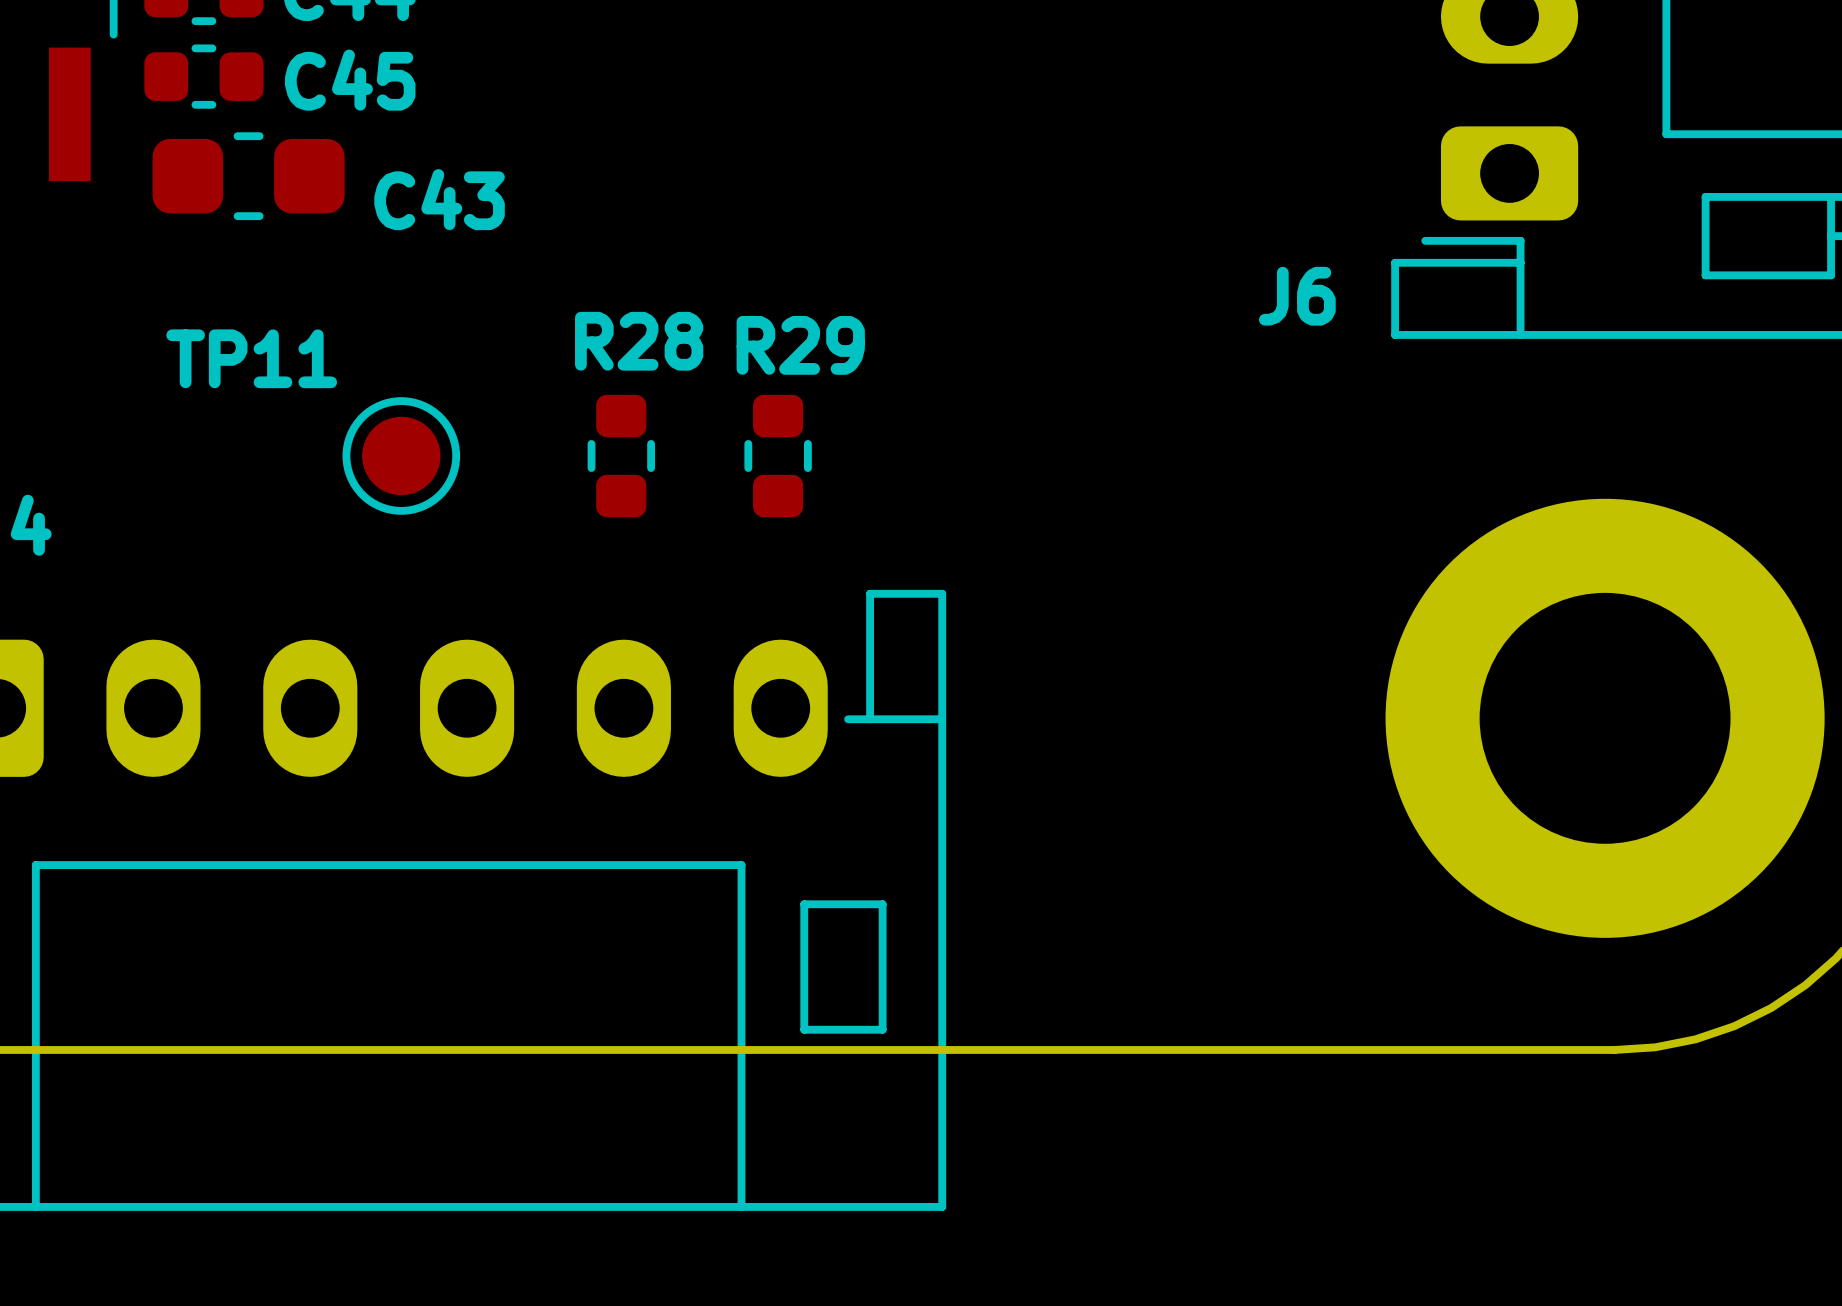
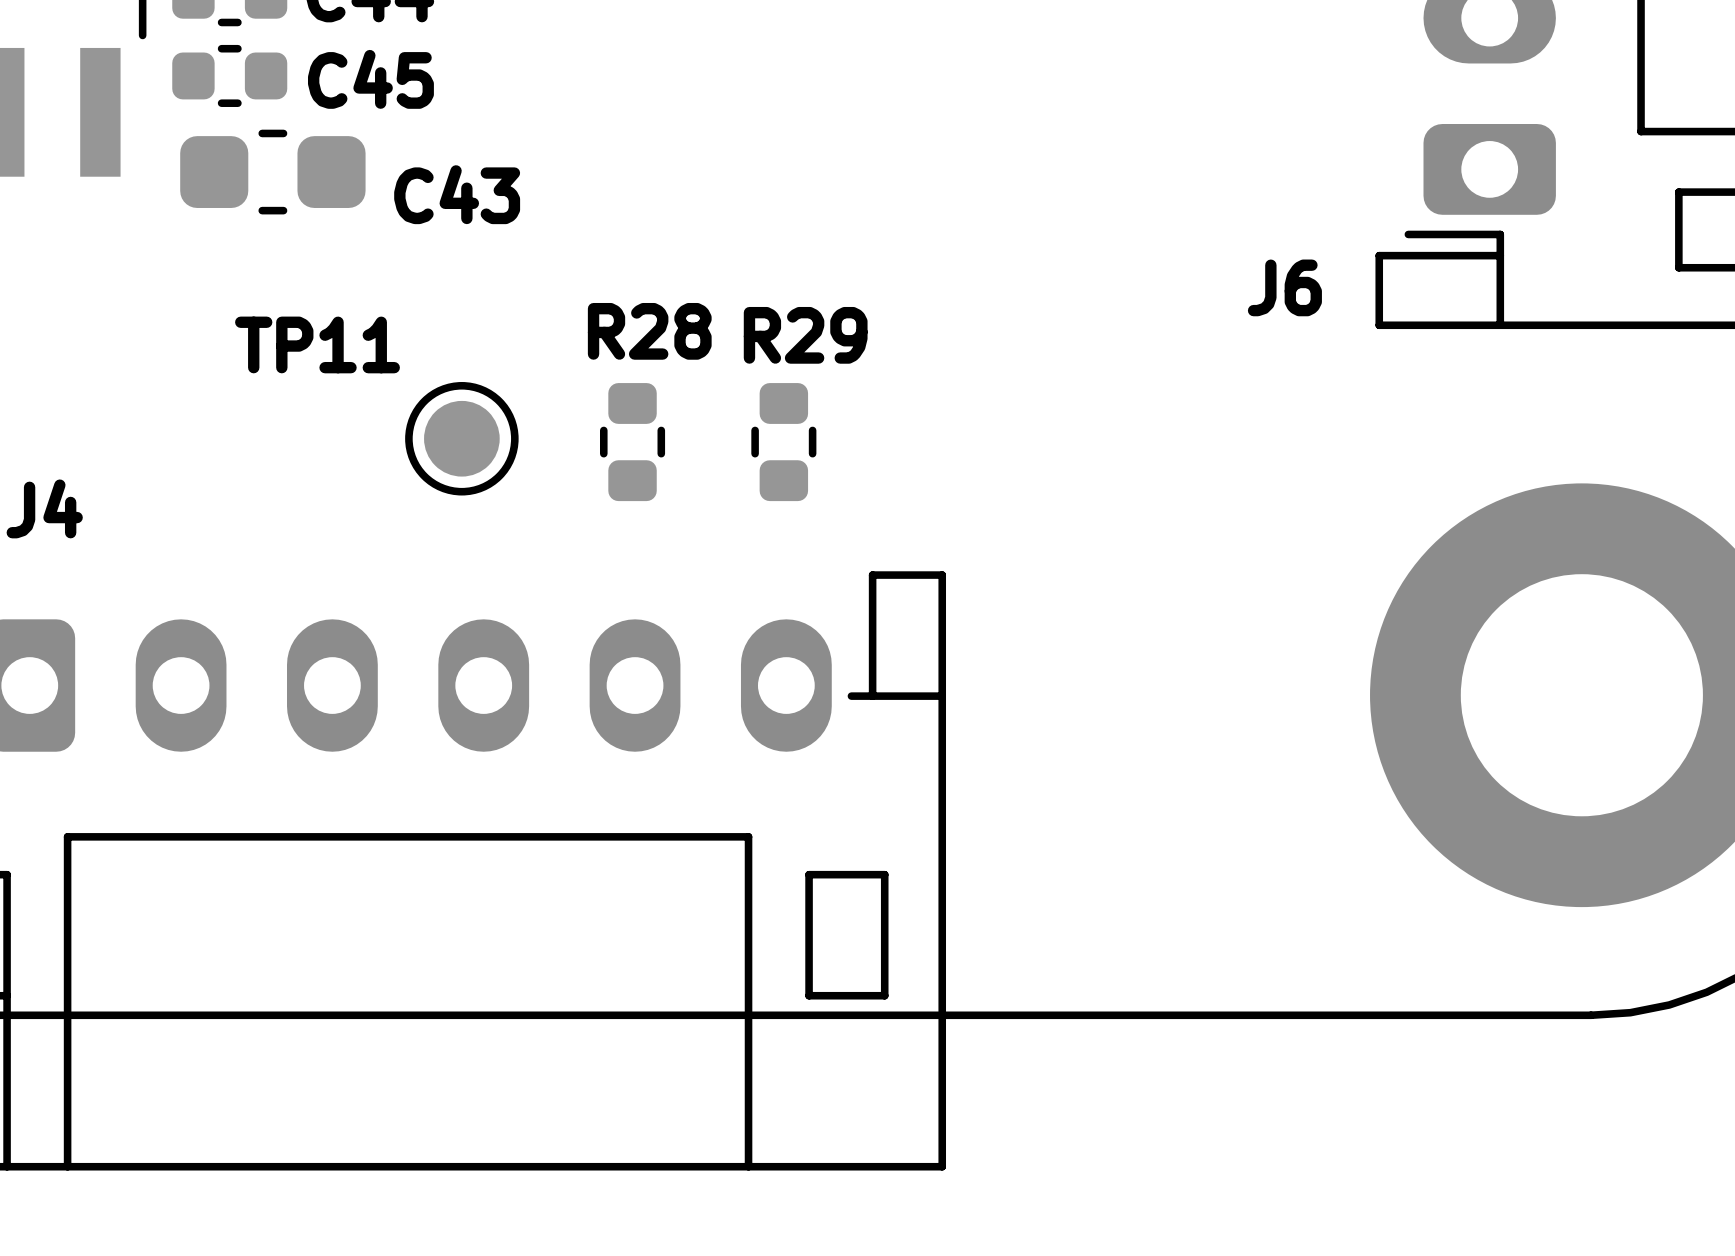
TP11 position: (401, 455) -> (461, 438)

